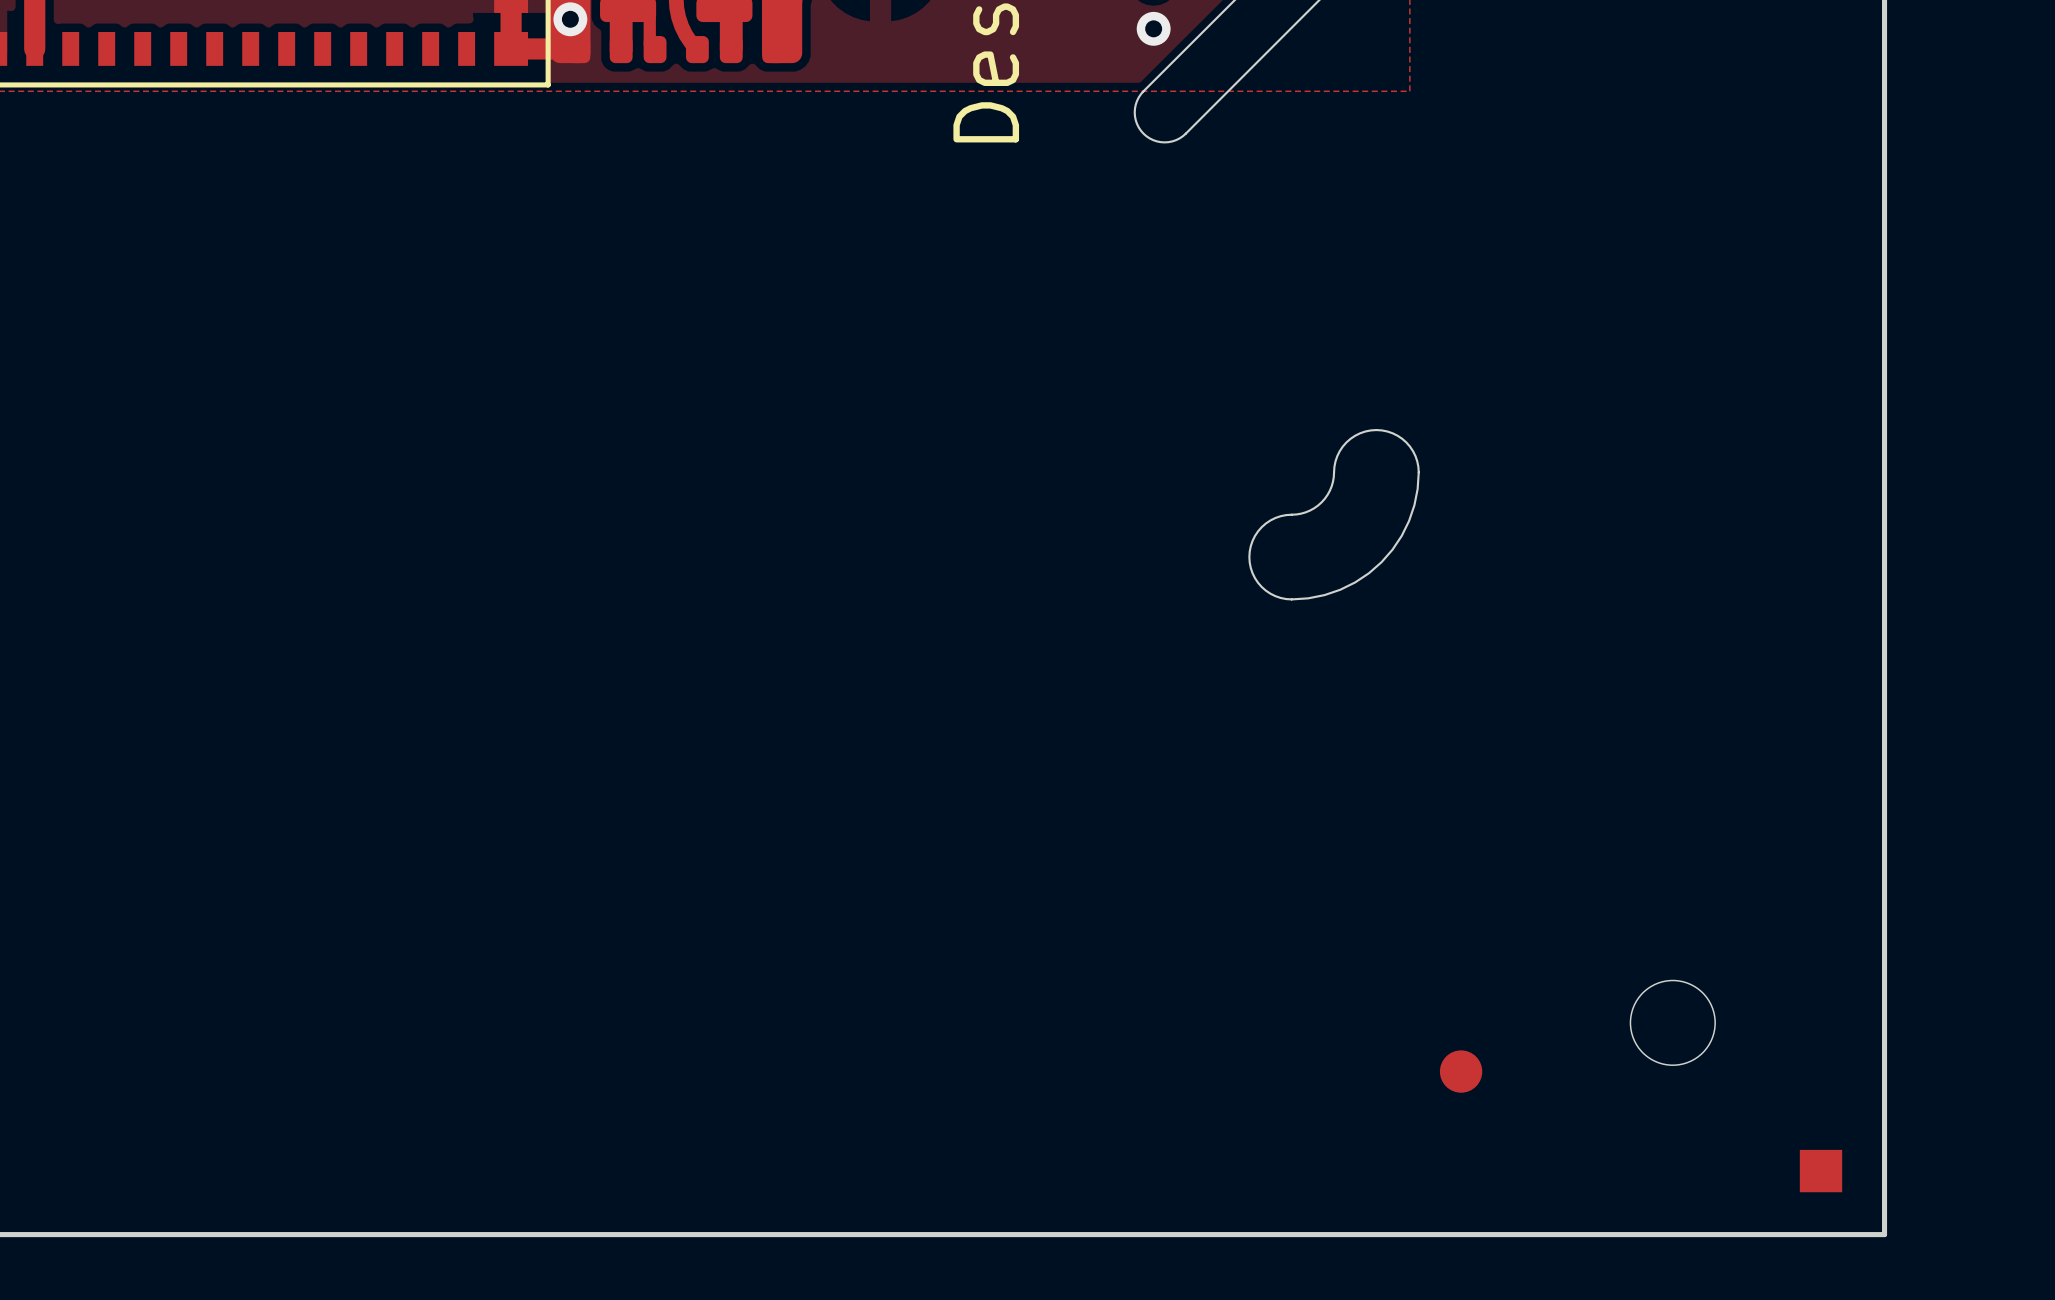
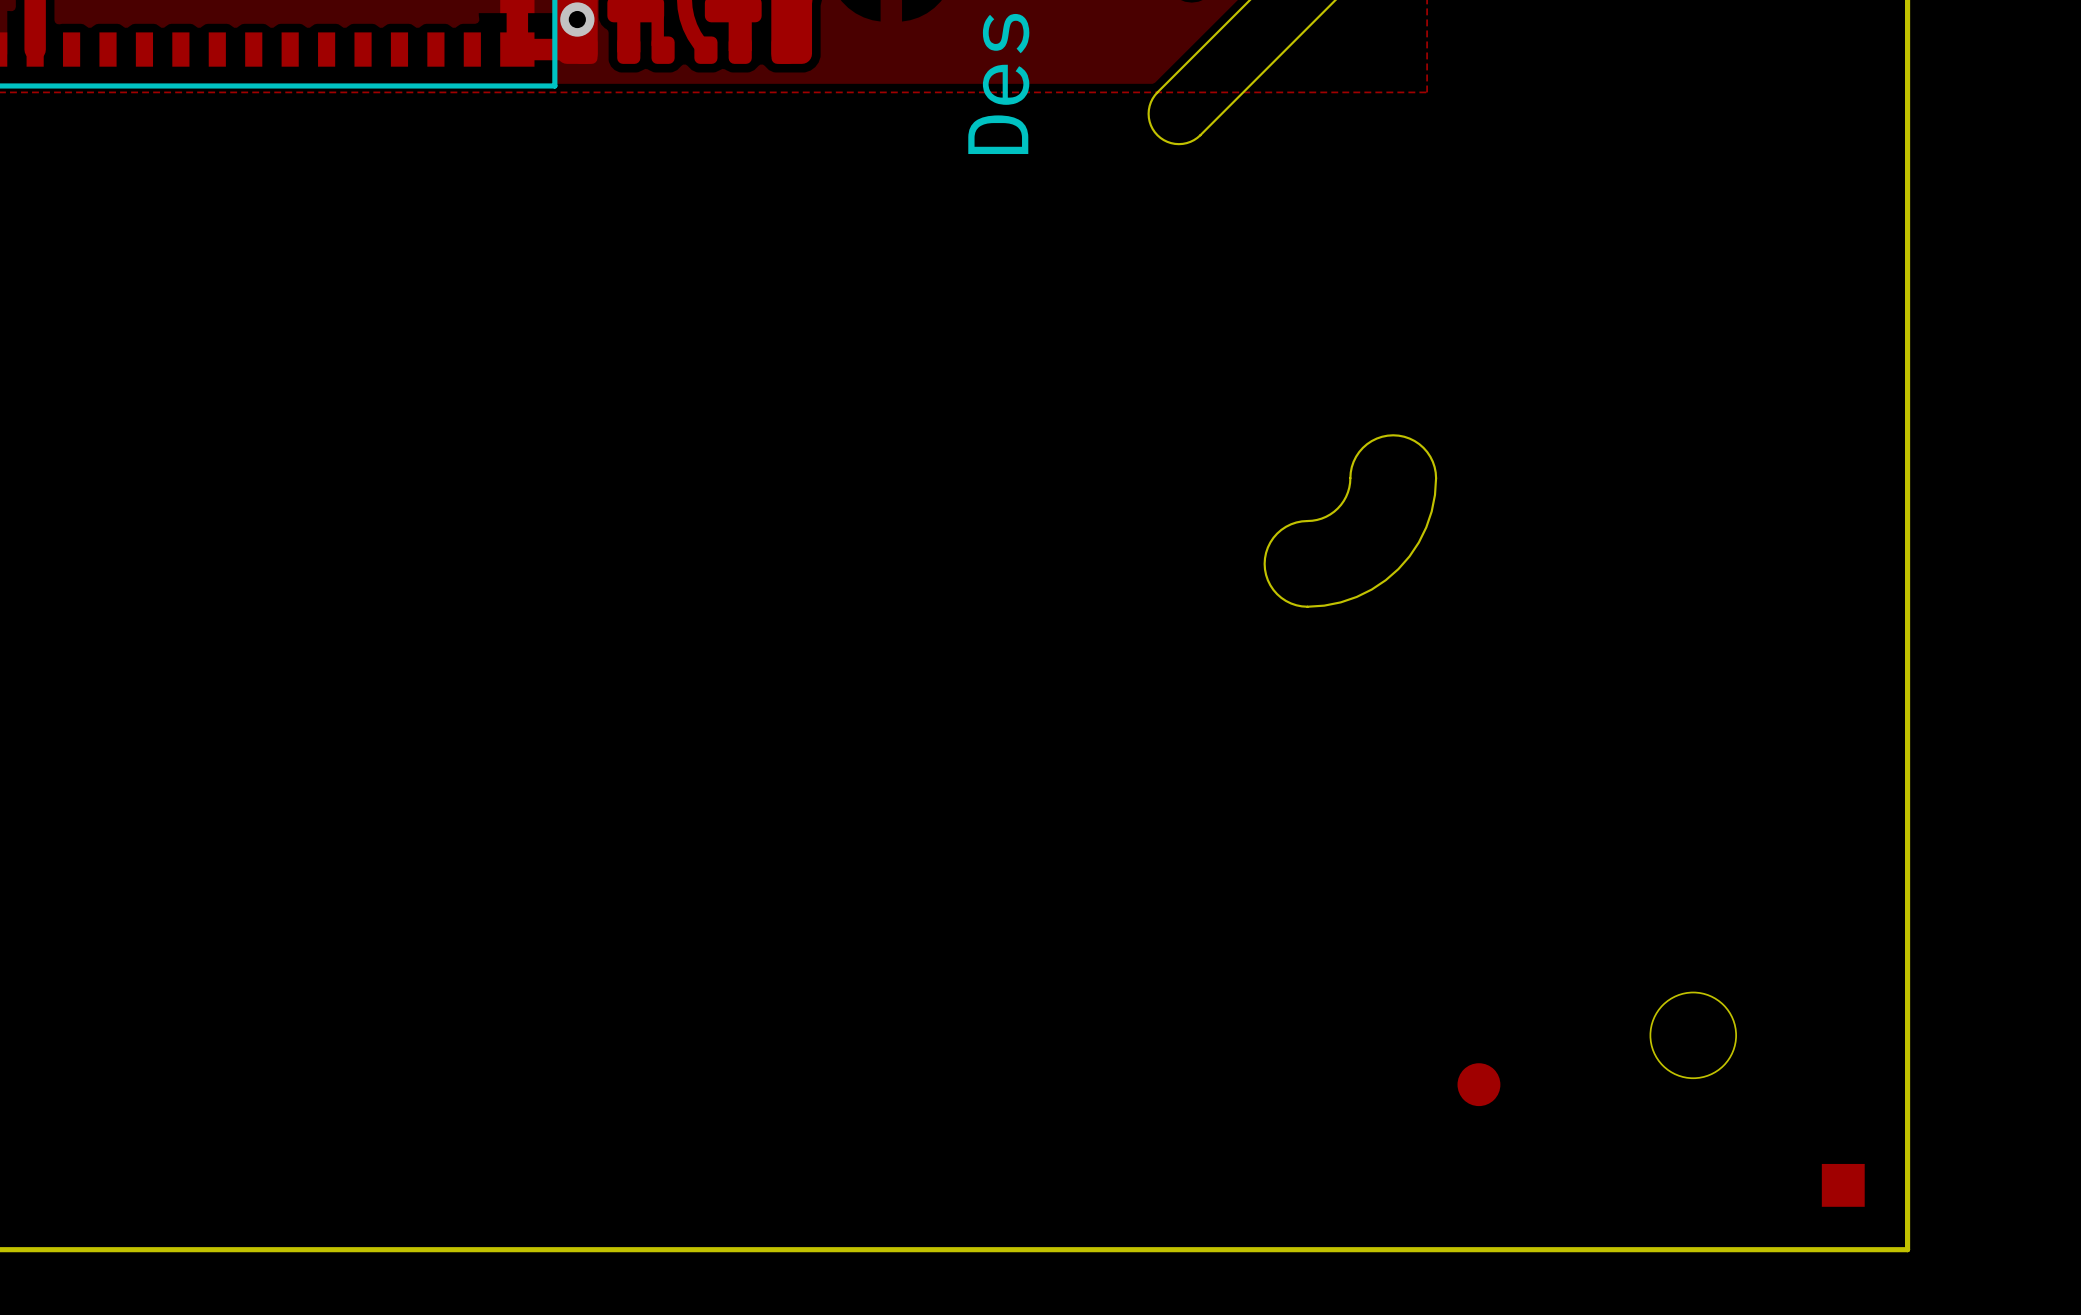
via: (1153, 28) -> none

